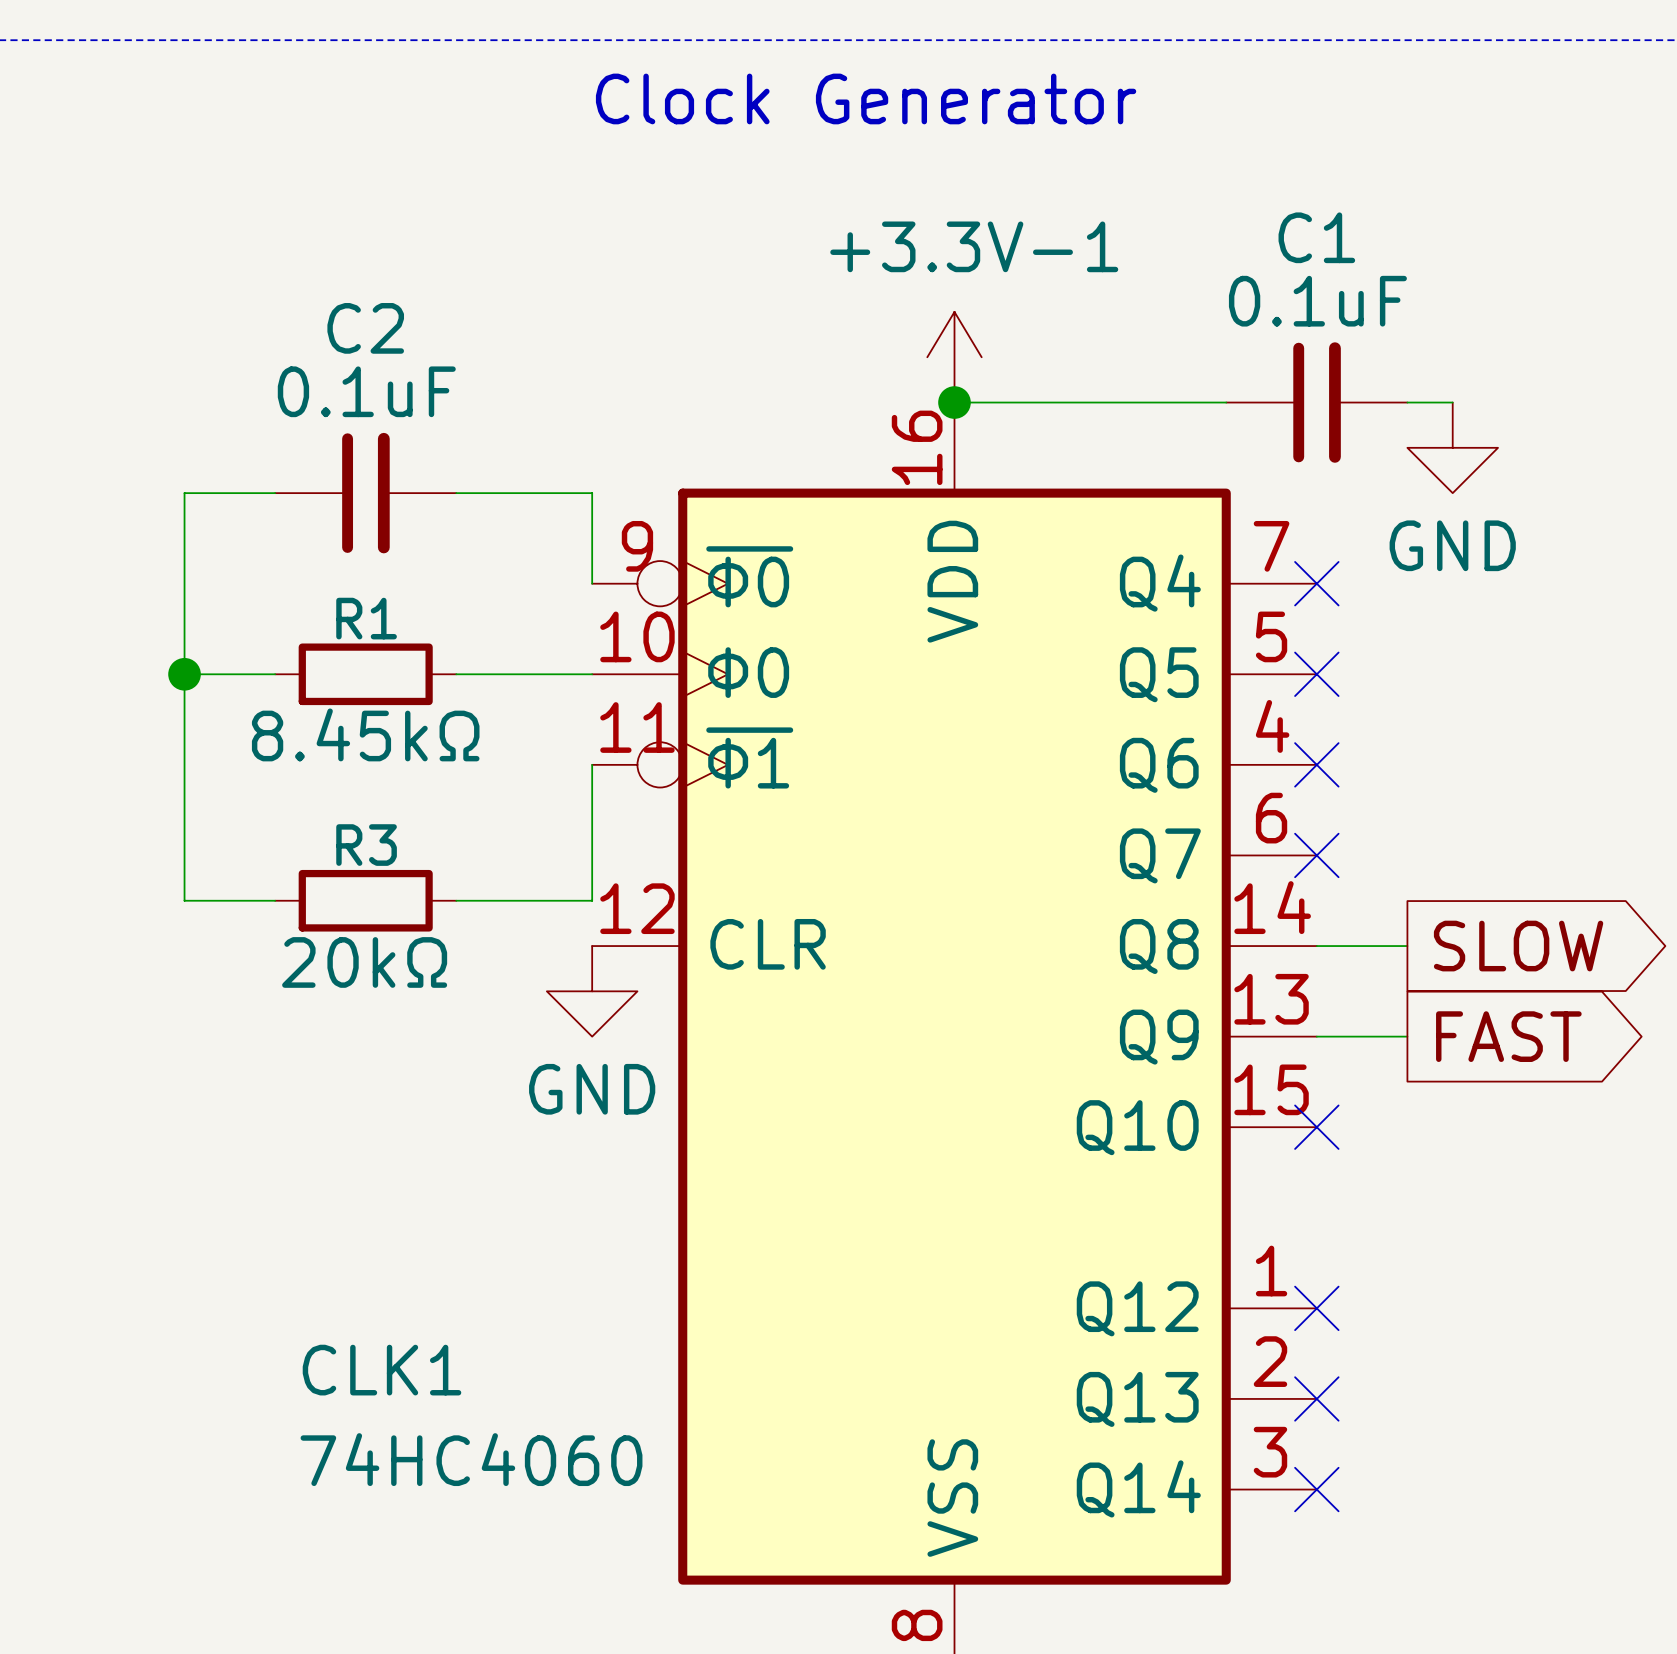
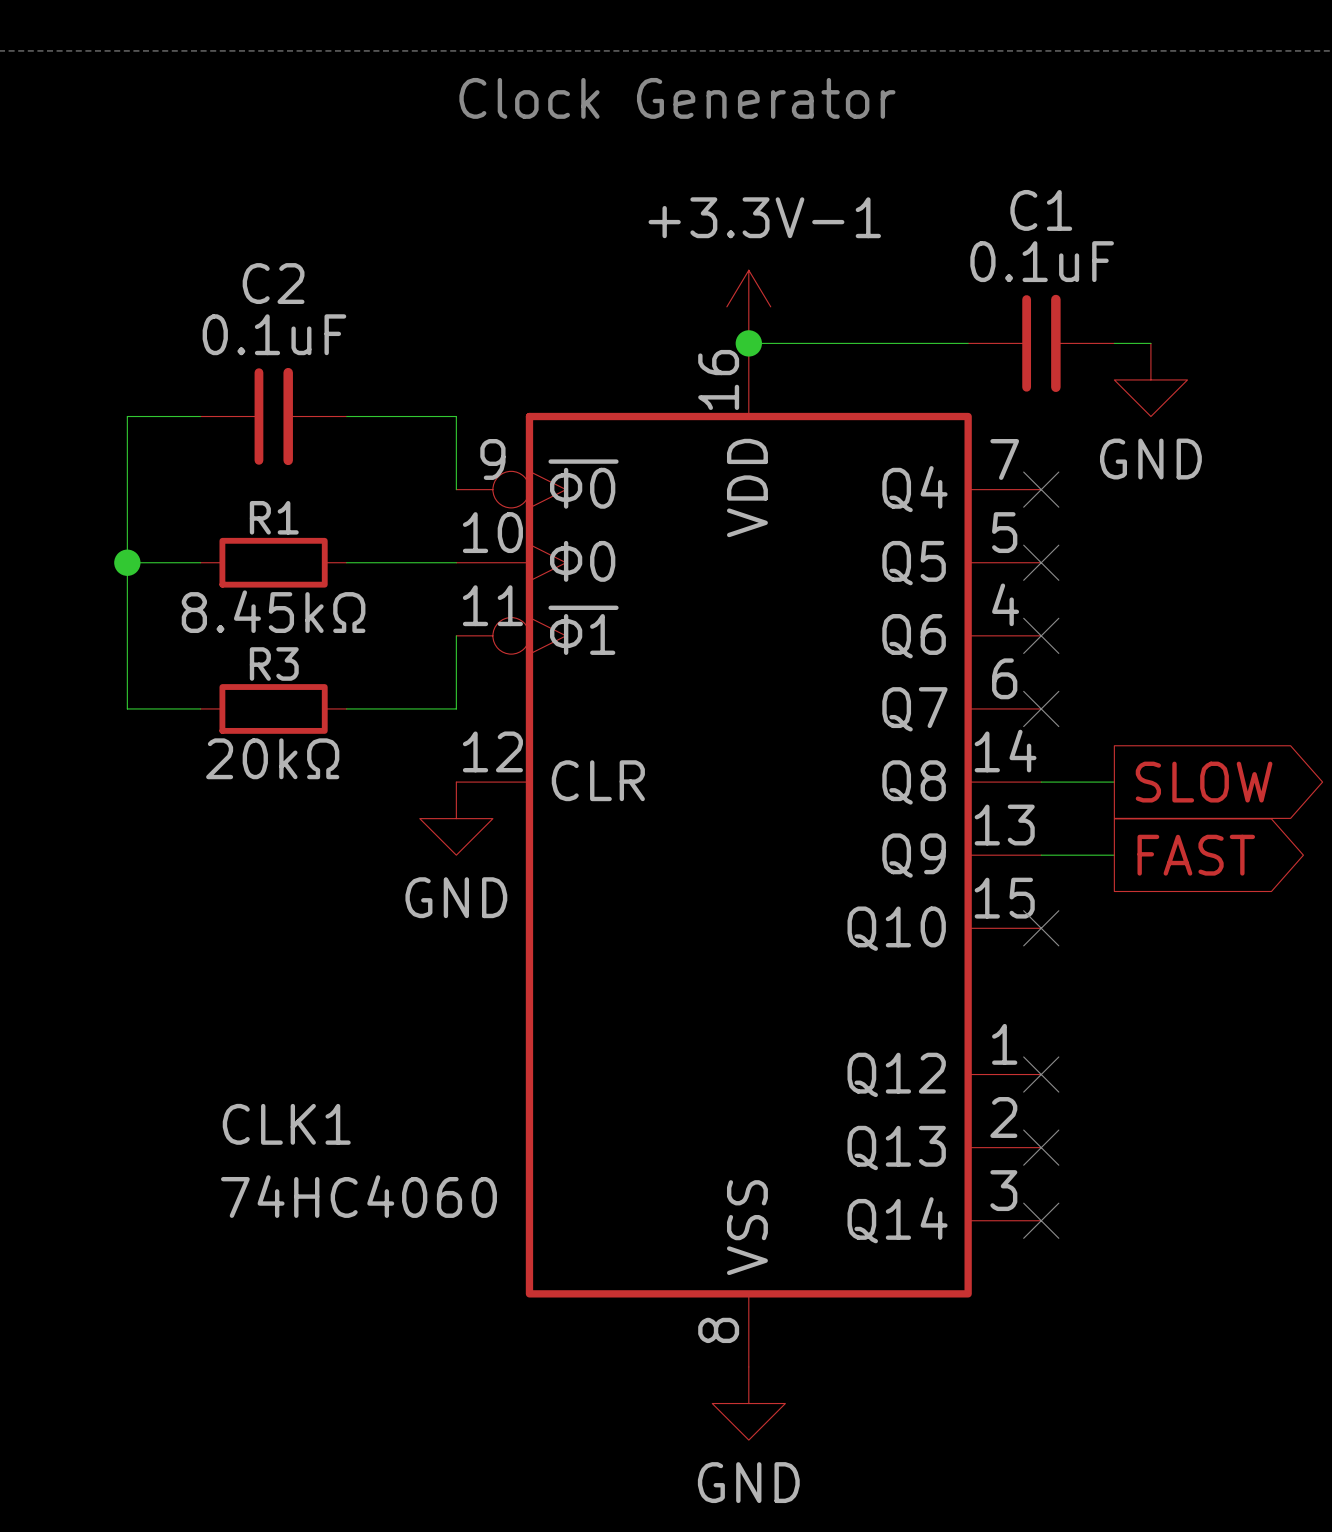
wire: (184, 855) (184, 900) (275, 900) -> (127, 708) (200, 708)
wire: (592, 855) (592, 900) (456, 900) -> (456, 708) (346, 708)
R3 position: (365, 900) -> (273, 708)

